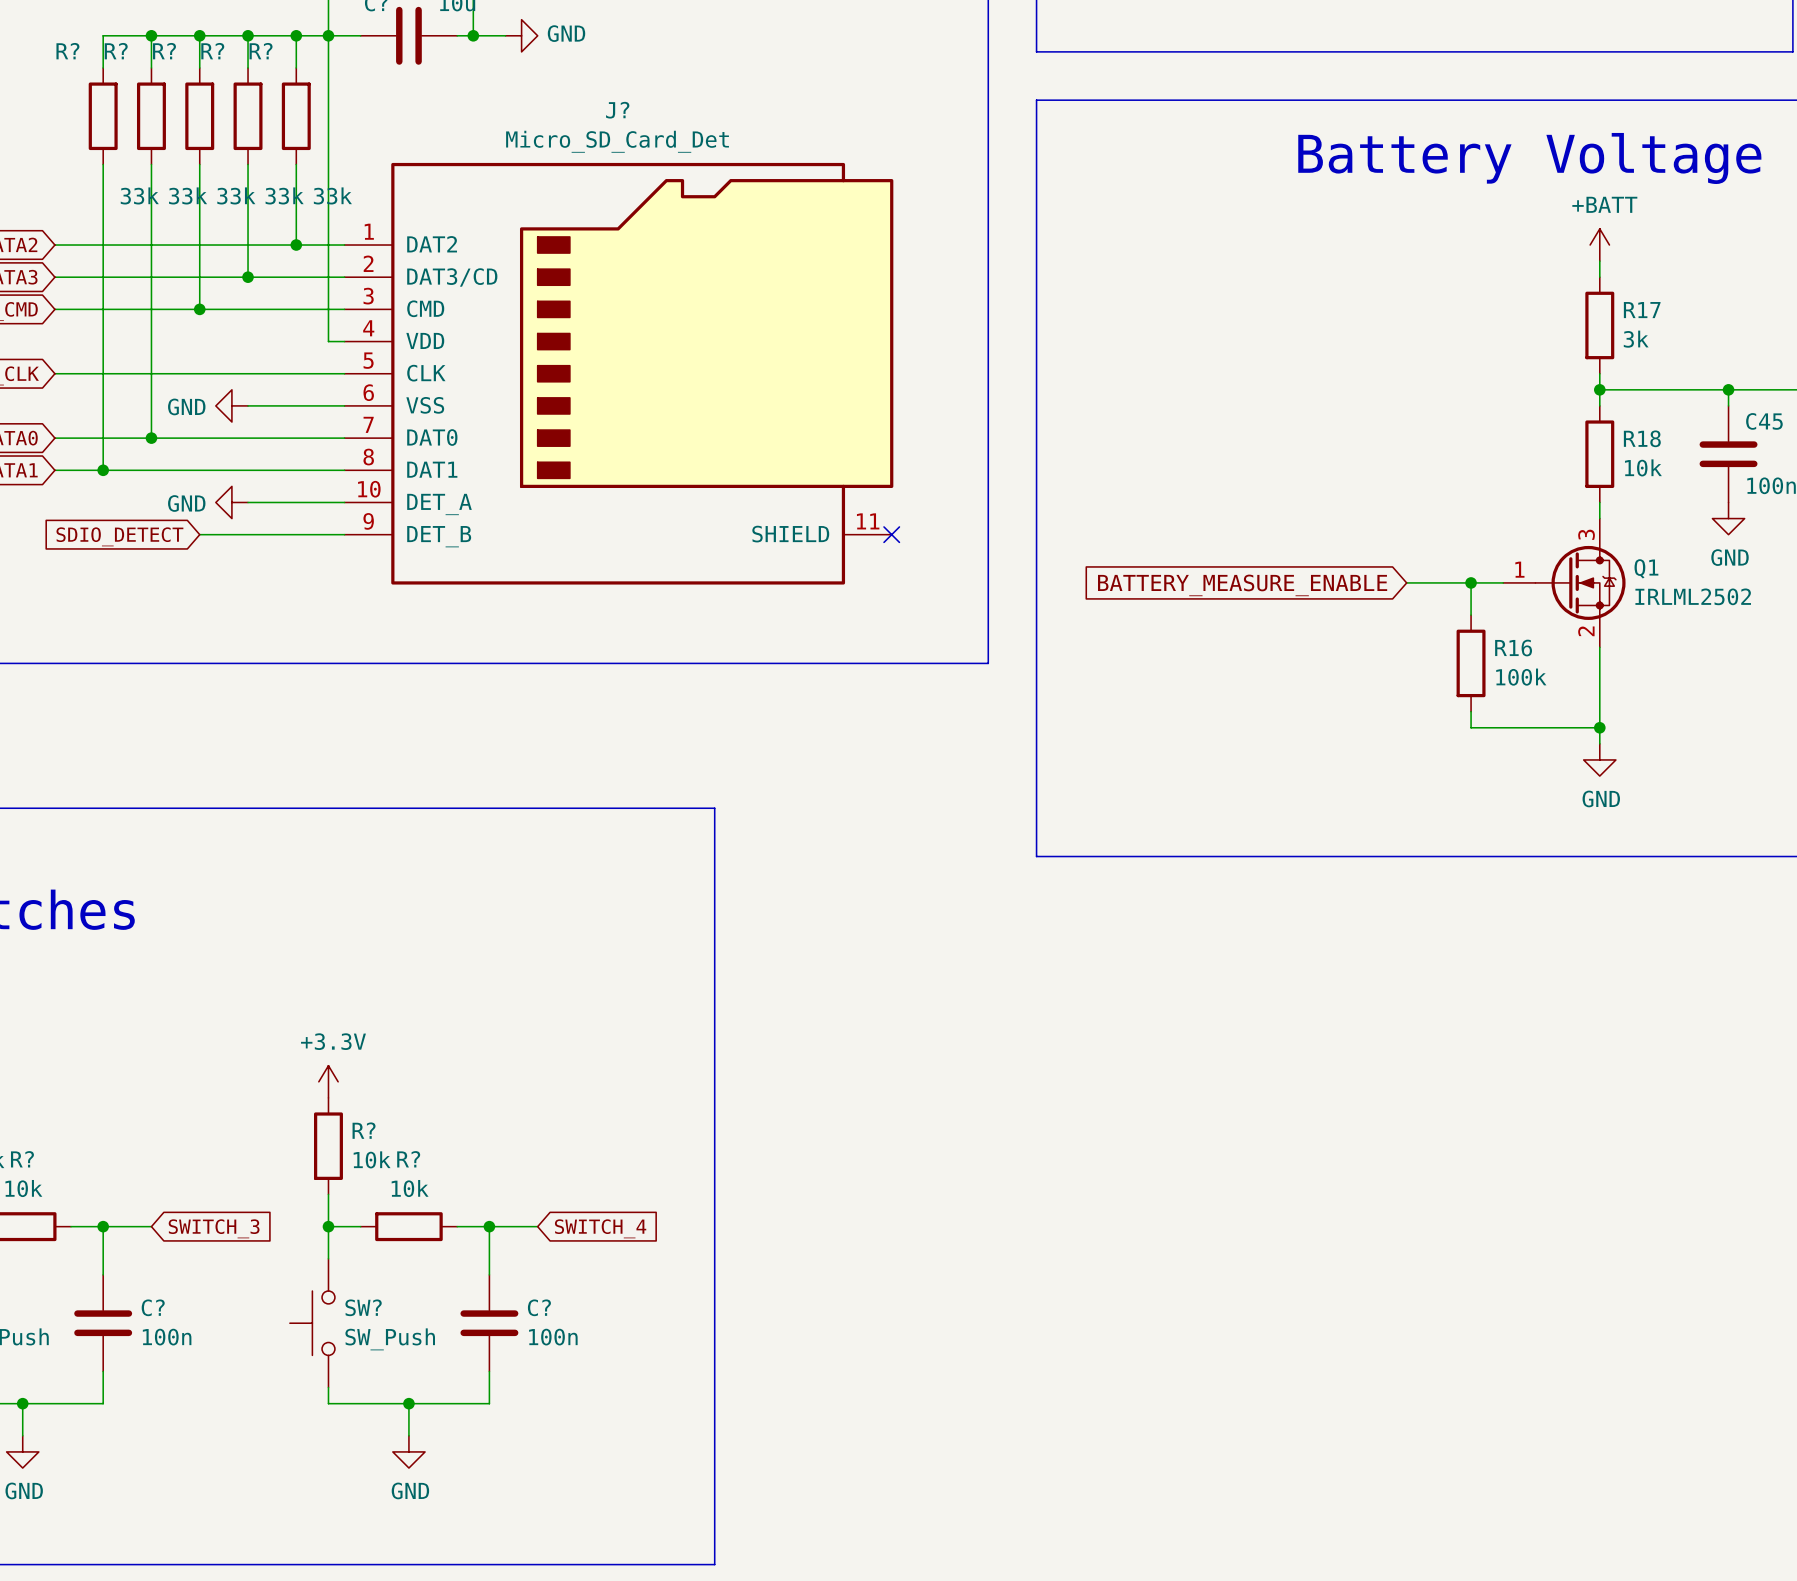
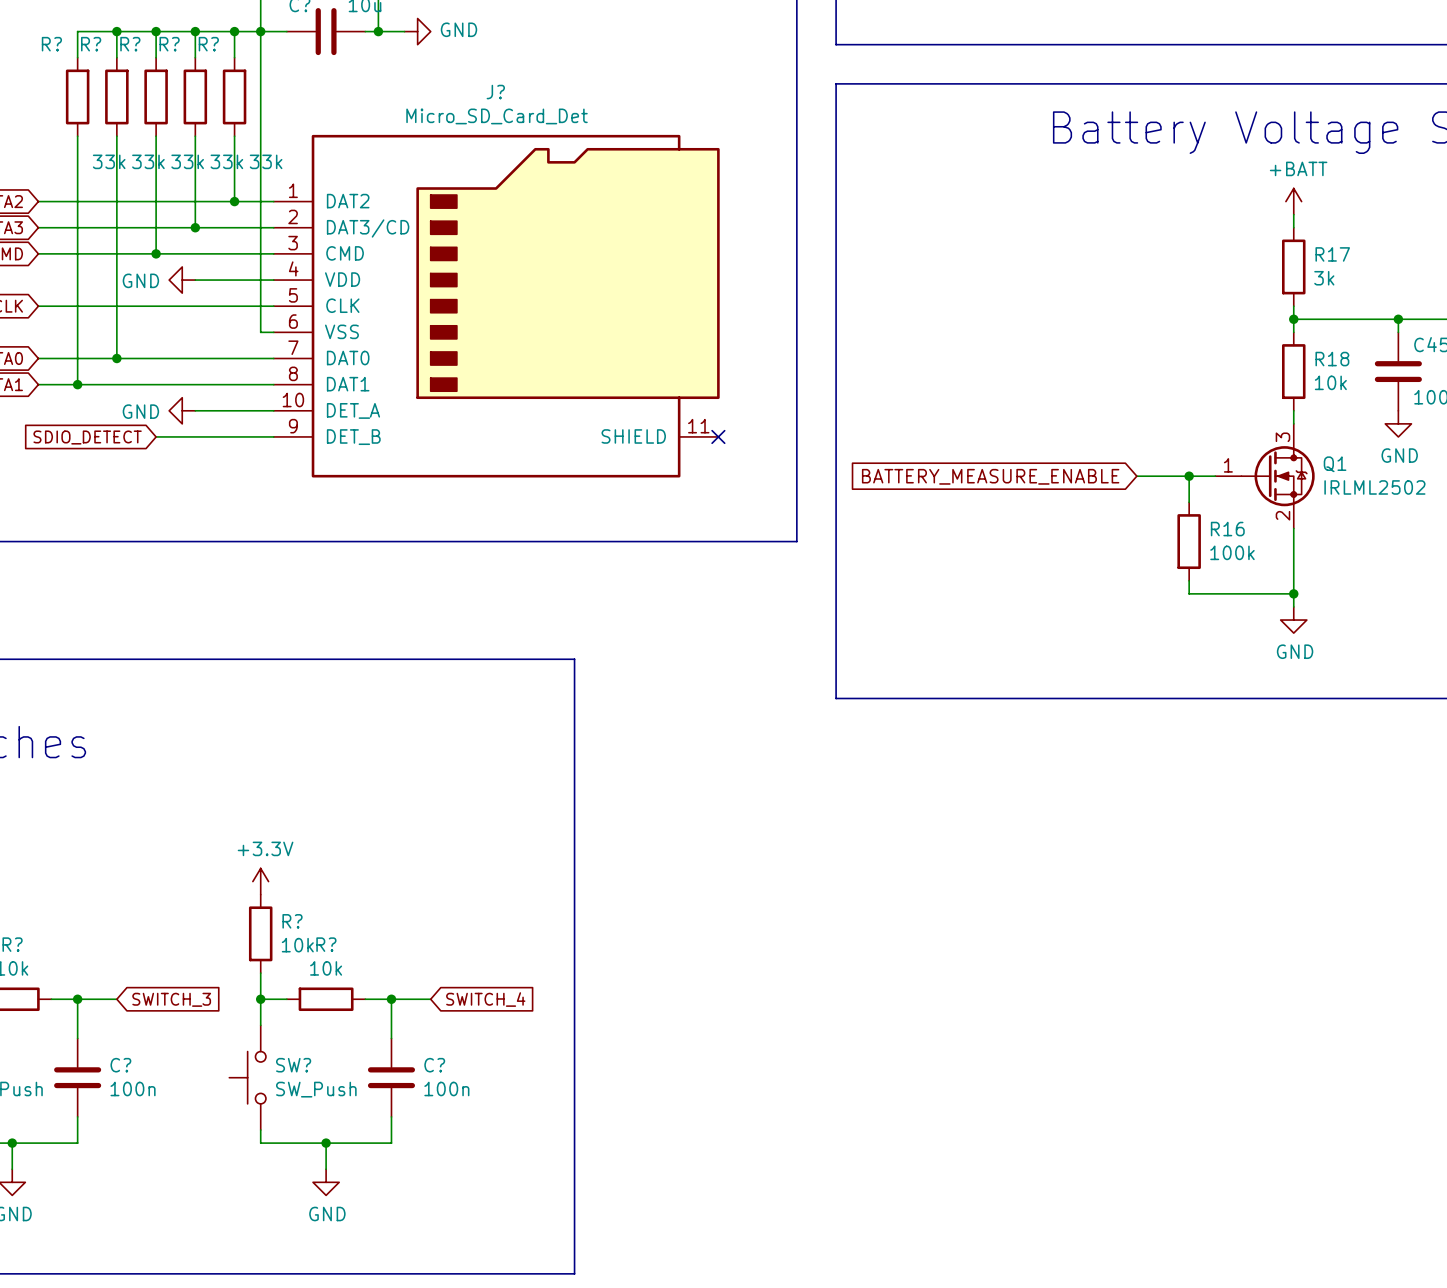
power symbol position: GND (231, 405) -> GND (182, 280)
wire: (248, 405) (328, 405) -> (195, 280) (260, 280) (260, 332)

